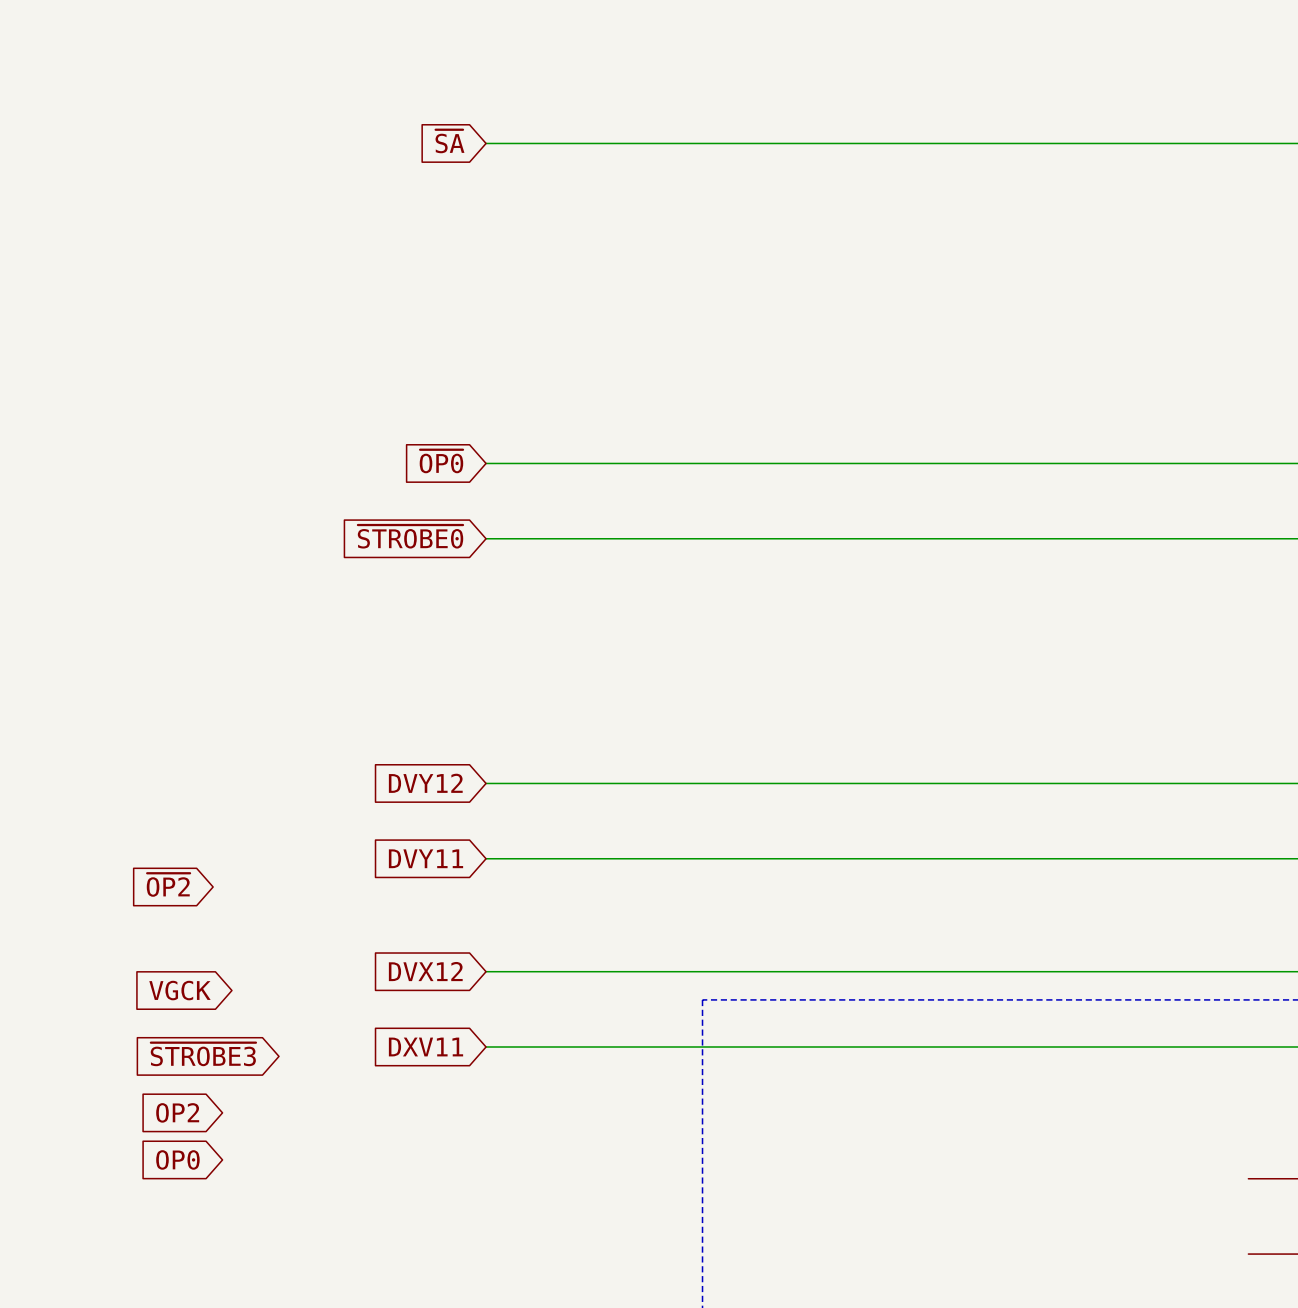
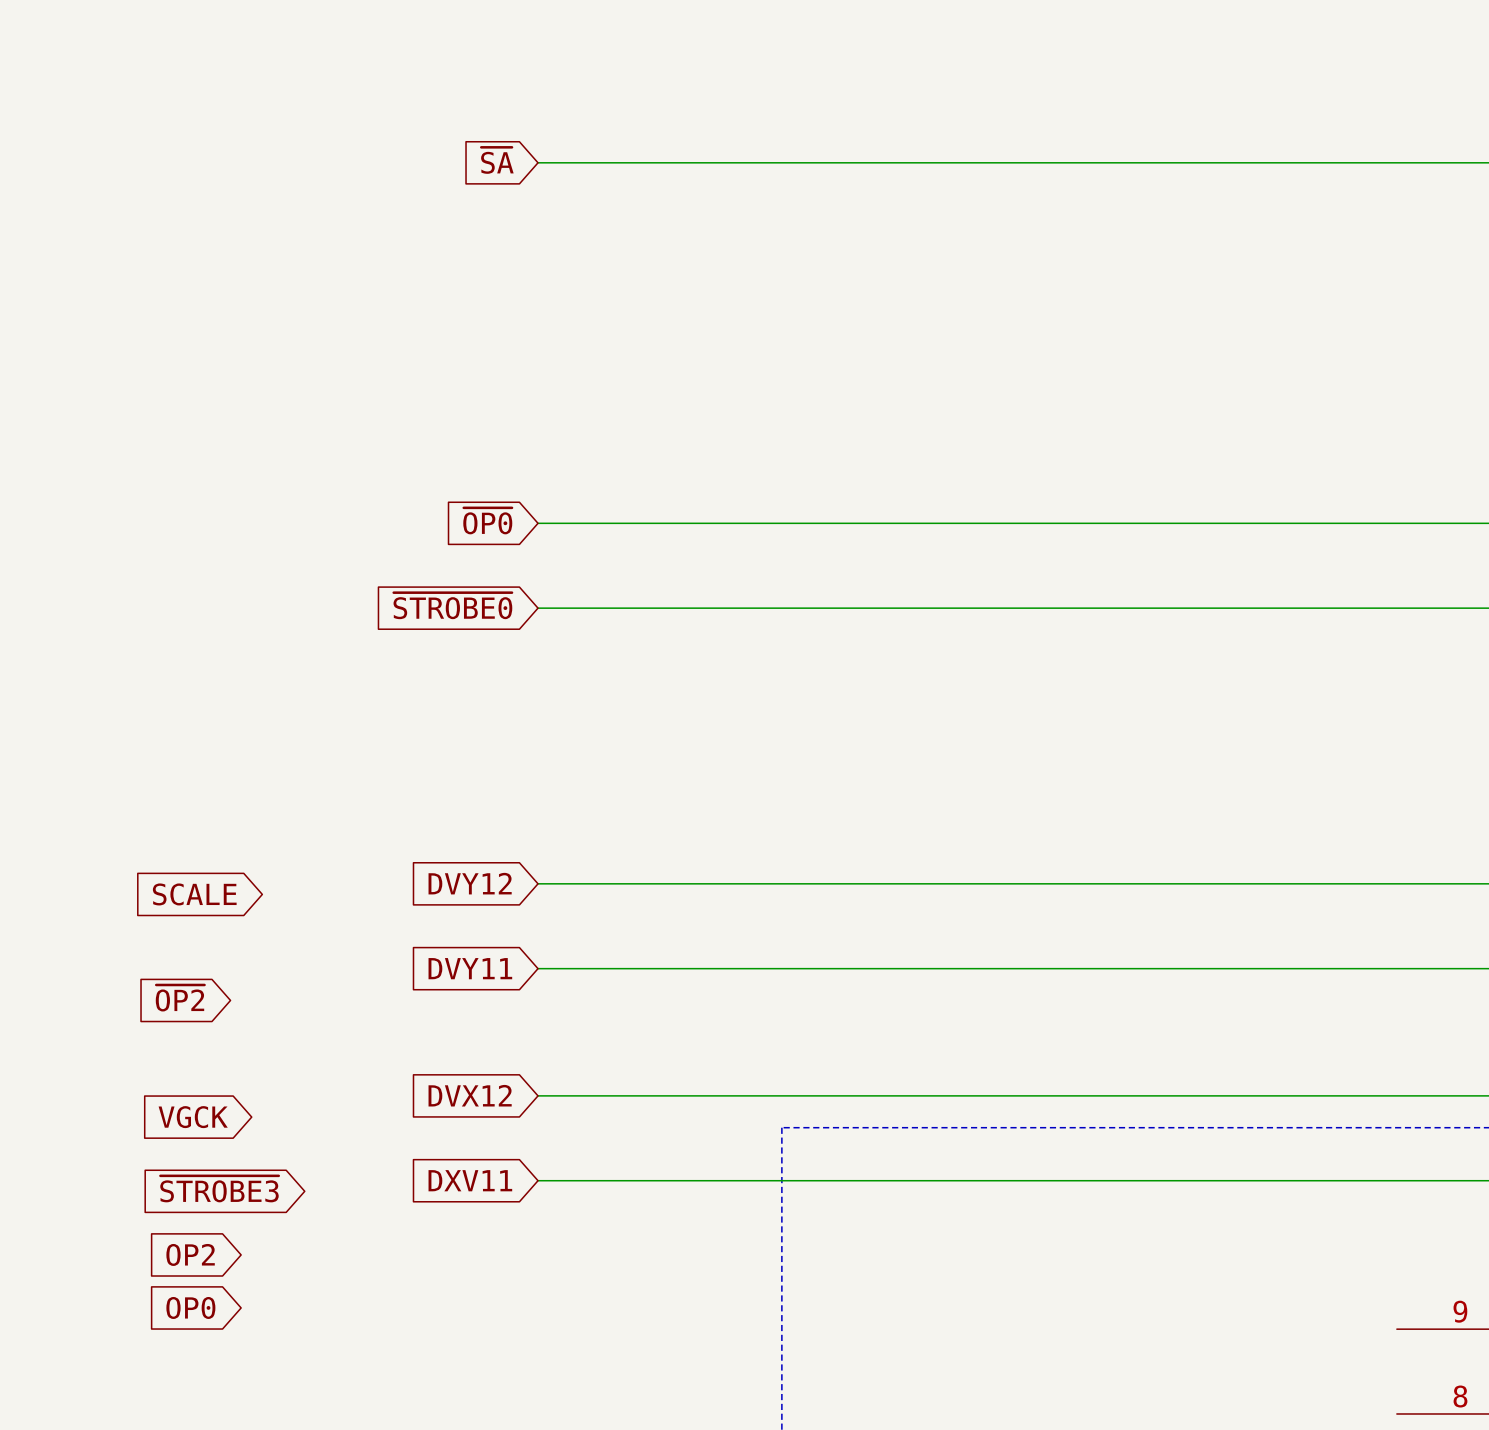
global label: none -> SCALE (194, 894)

